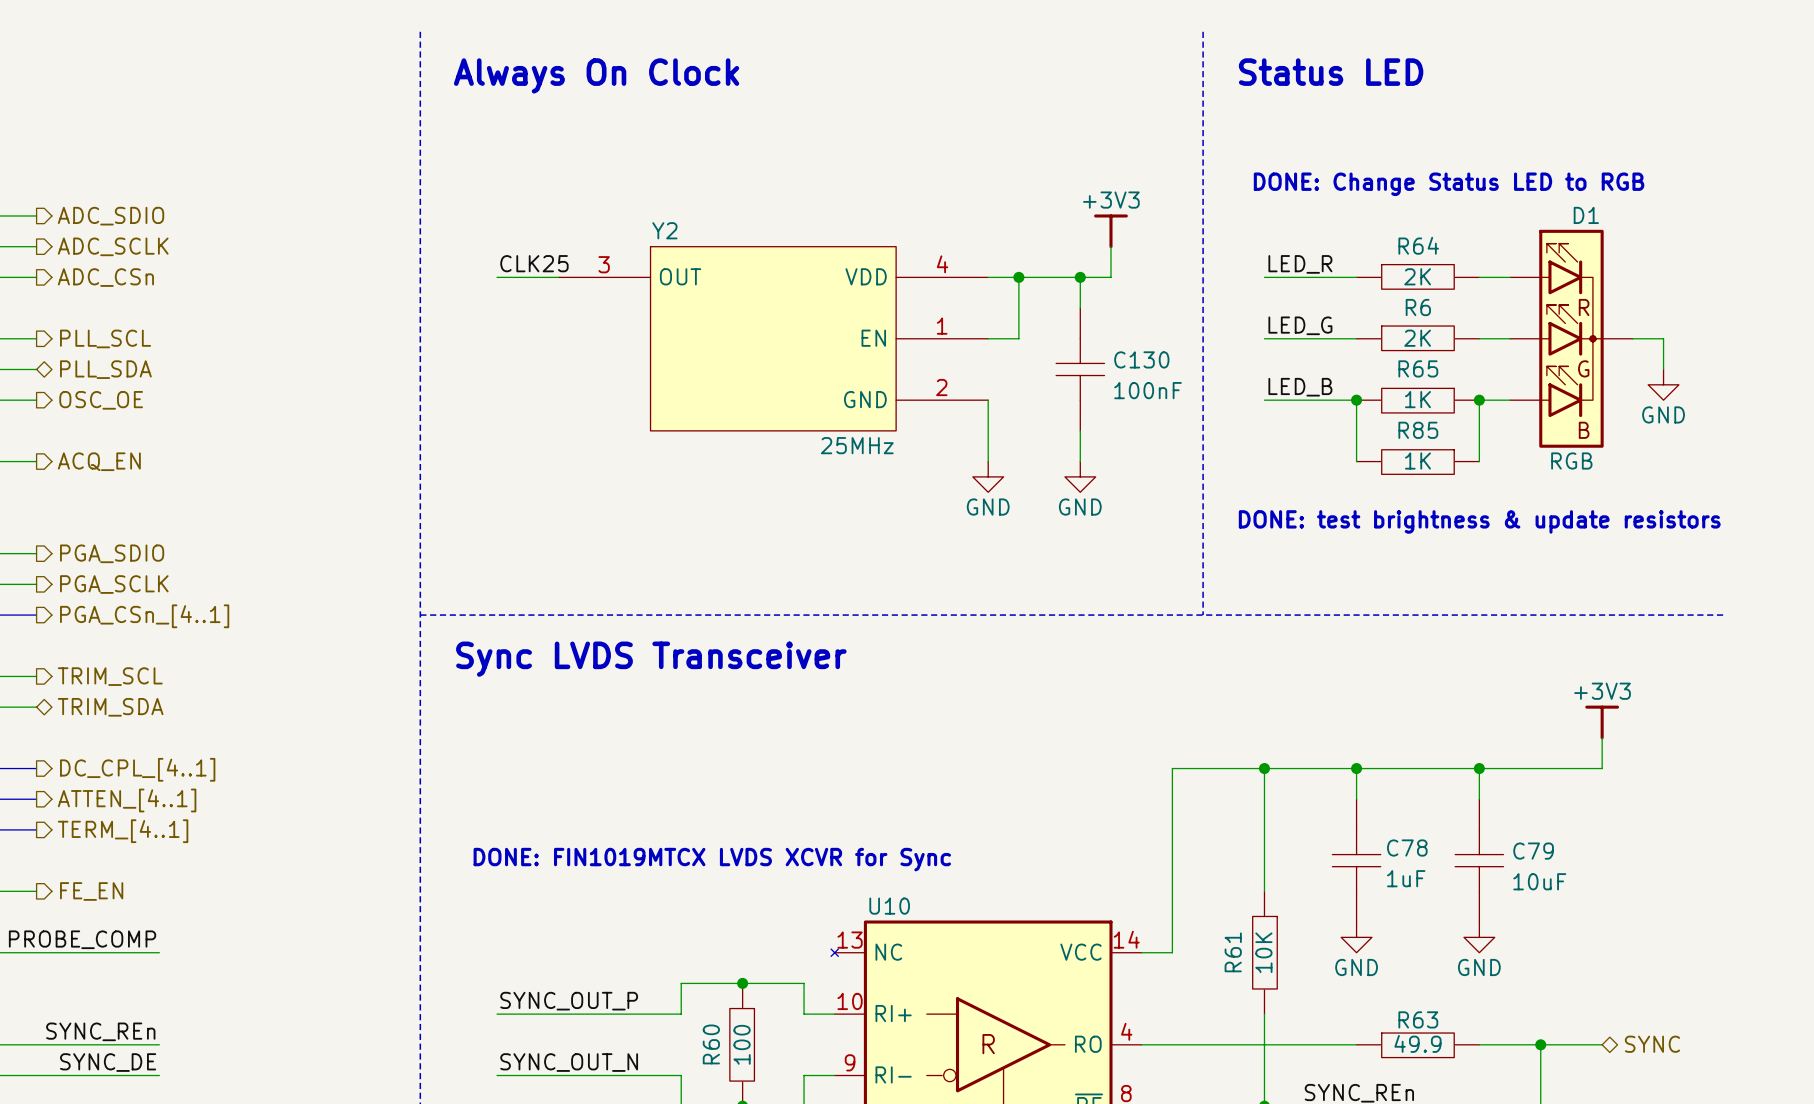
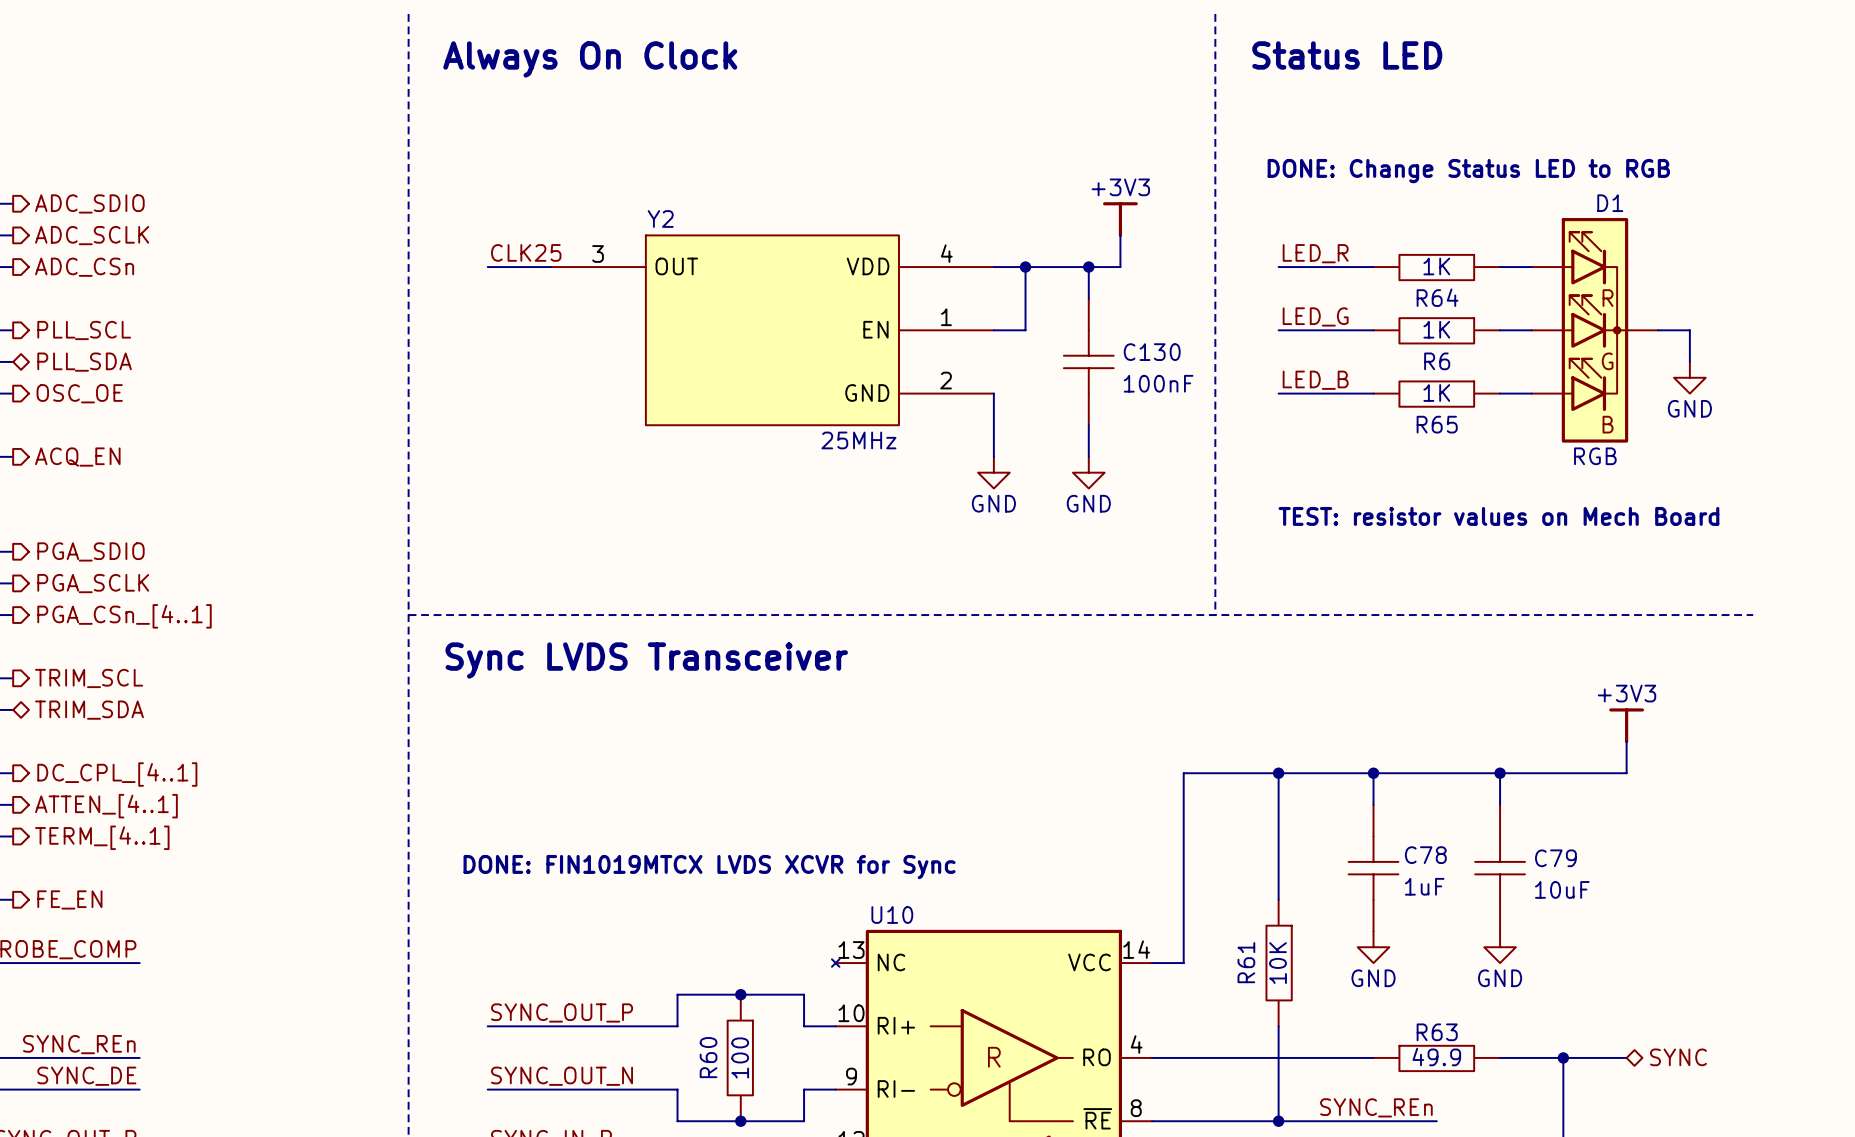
R64 rotation: 0° (1417, 276) -> 180° (1436, 267)
R64 value: 2K (1417, 276) -> 1K (1436, 266)
R6 rotation: 0° (1417, 338) -> 180° (1436, 330)
R6 value: 2K (1417, 338) -> 1K (1436, 329)
R65 name position: R65 (1418, 368) -> R65 (1437, 424)
wire: (1356, 400) (1356, 461) -> none
junction: (1356, 400) -> none
wire: (1479, 400) (1479, 461) -> none
junction: (1479, 400) -> none
R85: 1K (1417, 462) -> none
text: DONE: test brightness & update resistors (1479, 521) -> TEST: resistor values on Mech Board (1498, 516)

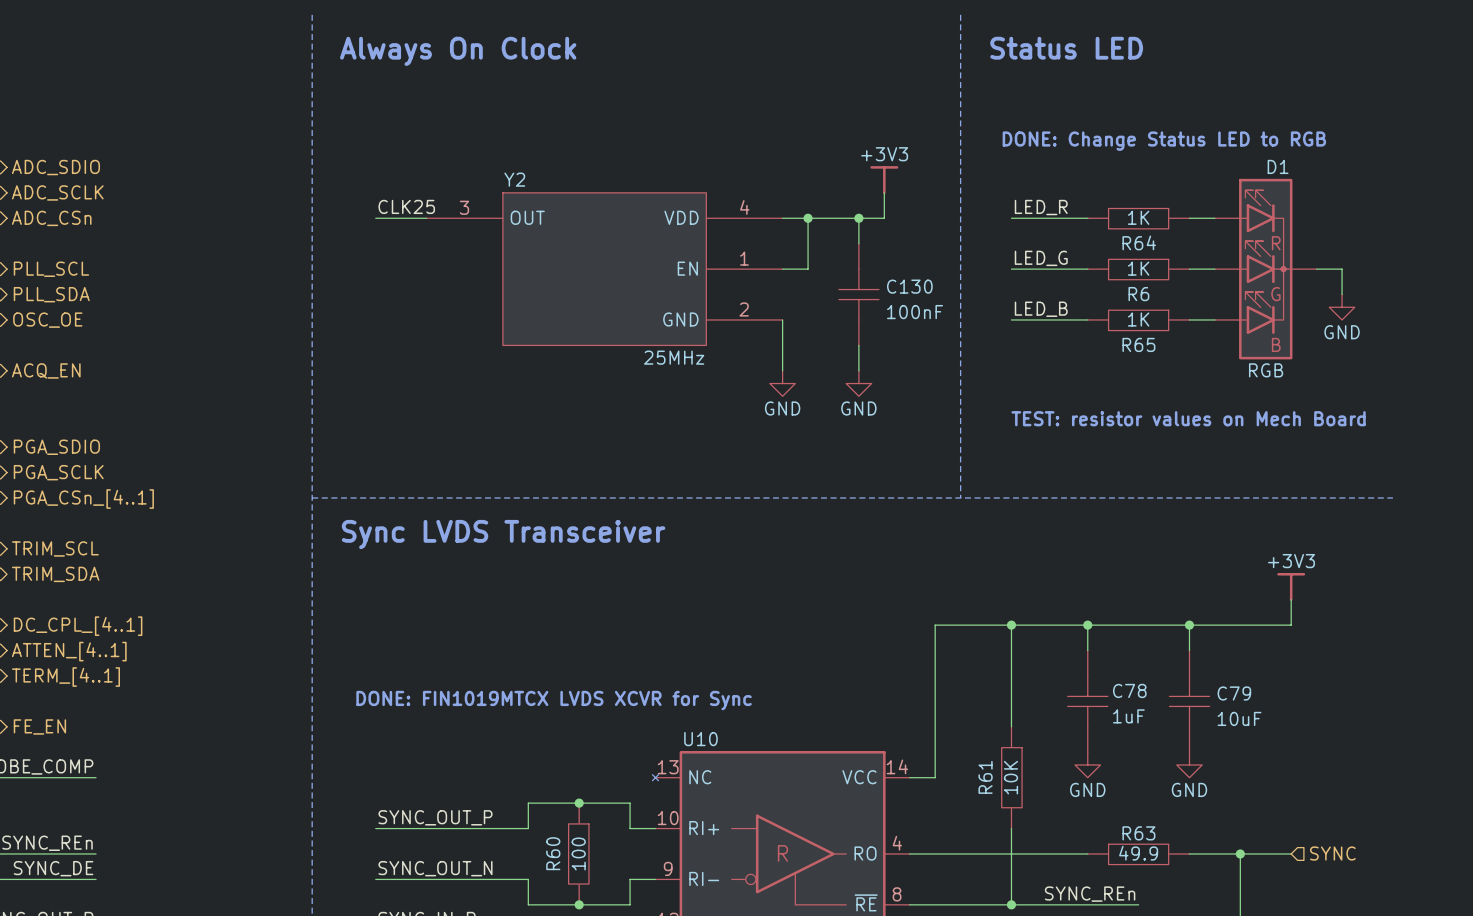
hierarchical label shape: bidirectional (1678, 1057) -> input (1332, 853)

